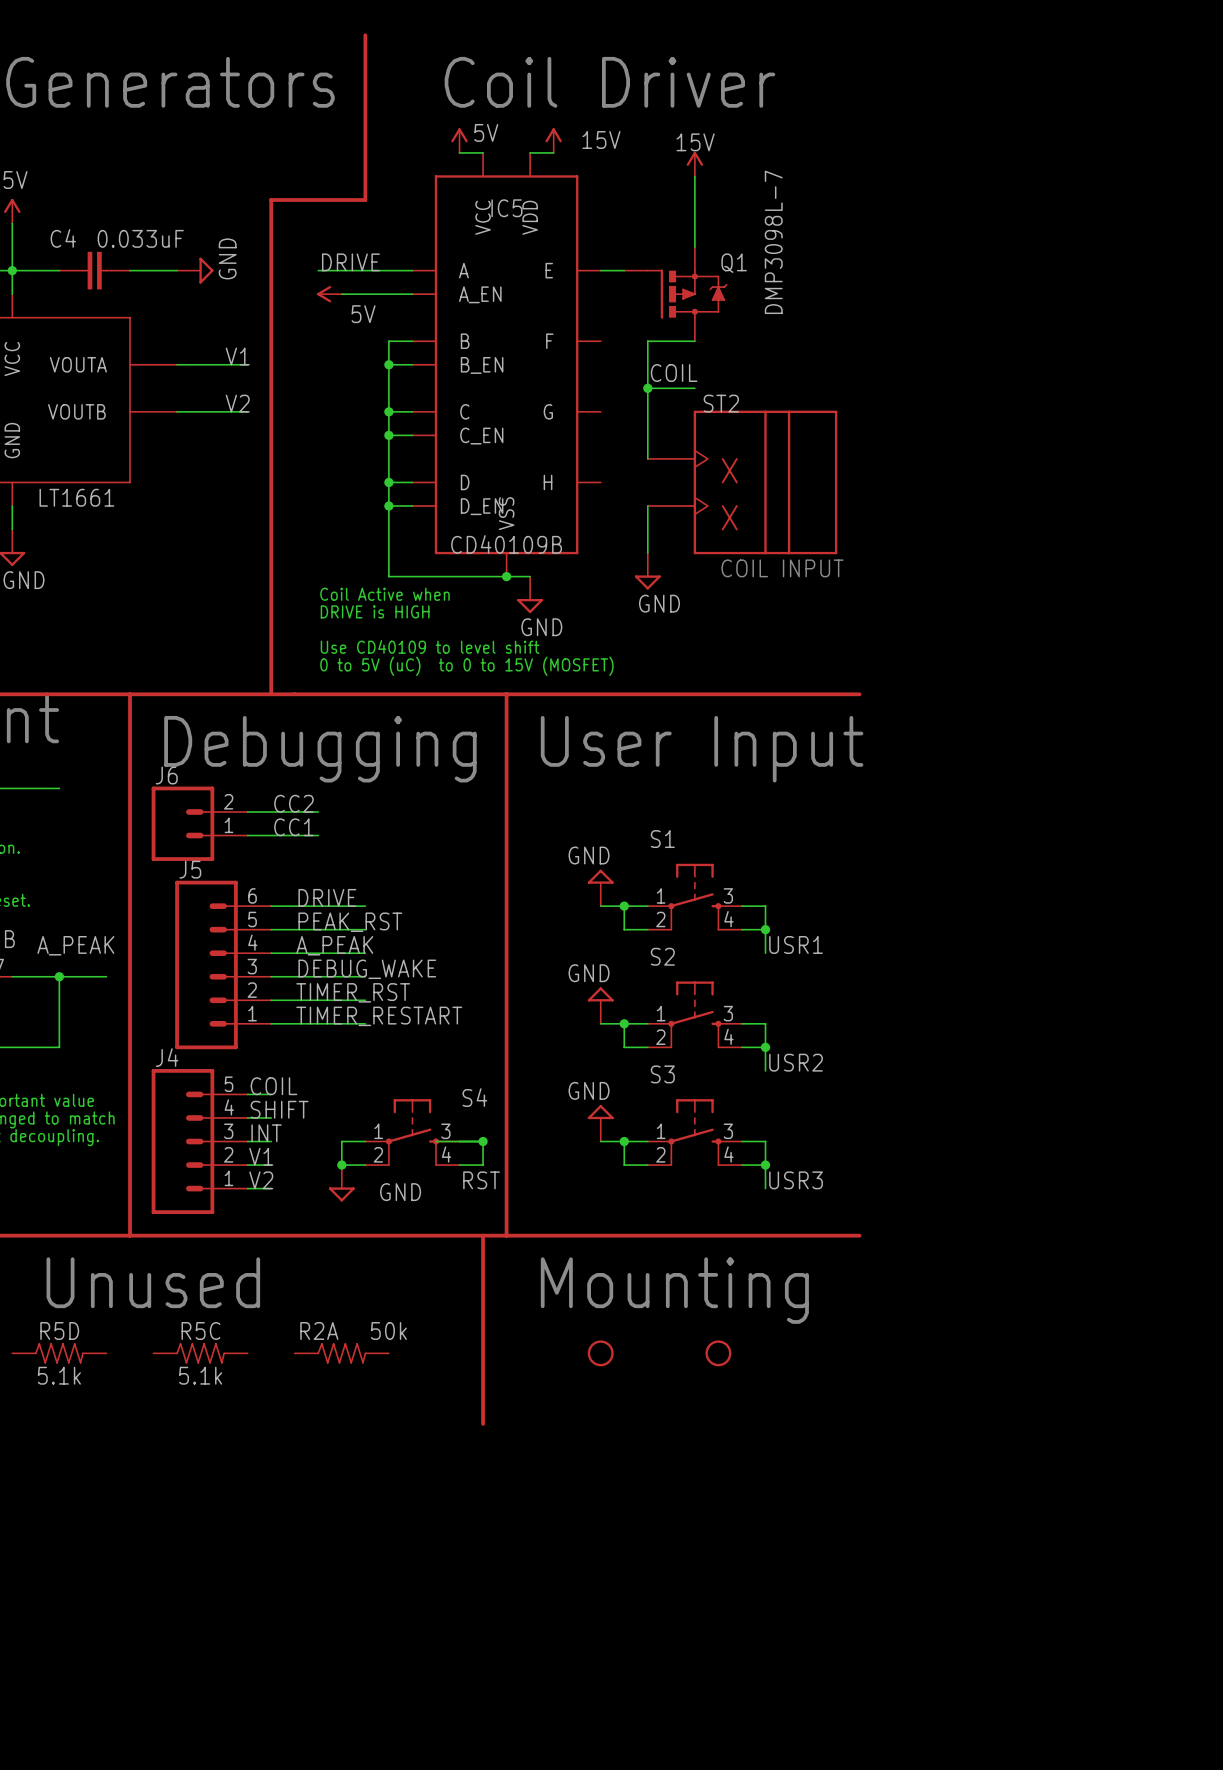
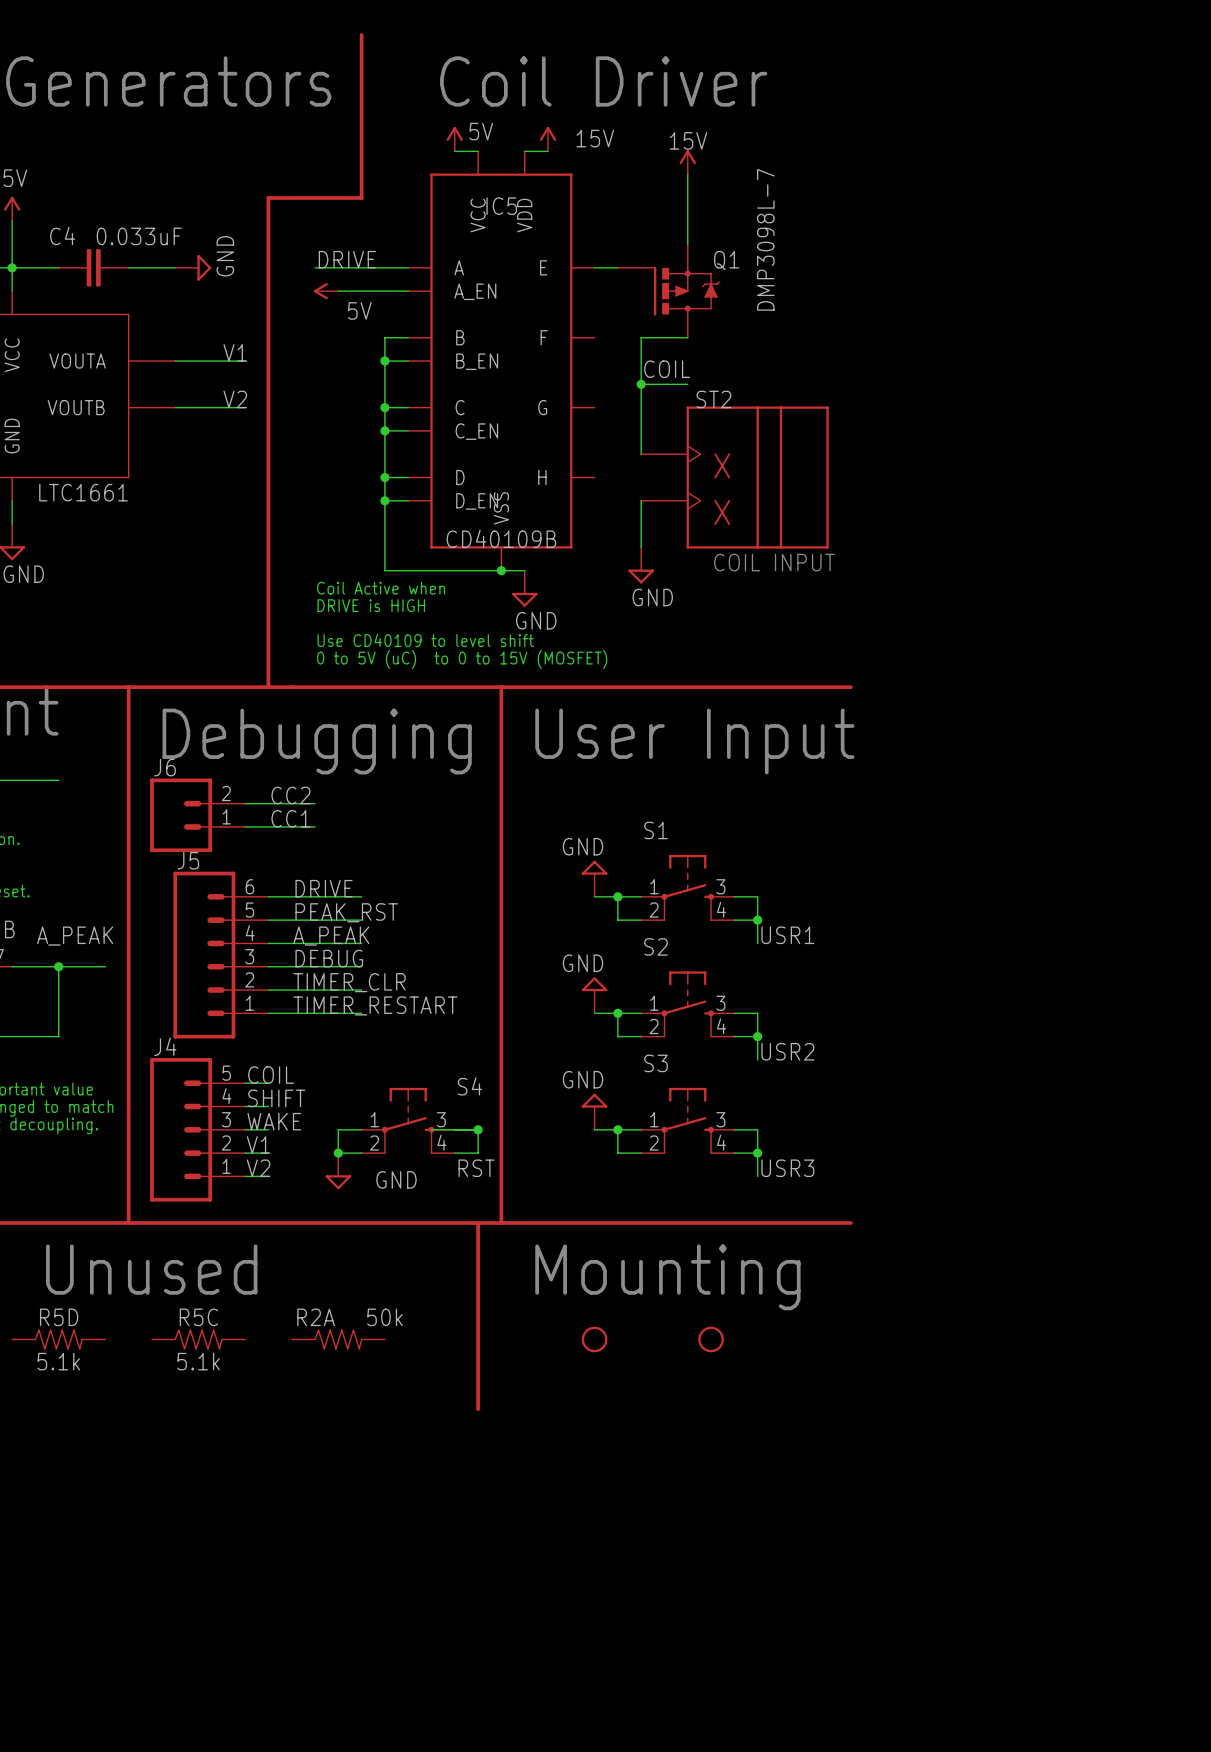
part text: LT1661 (76, 497) -> LTC1661 (83, 492)
label: DEBUG_WAKE (367, 969) -> DEBUG (329, 958)
label: TIMER_RST (353, 992) -> TIMER_CLR (349, 982)
label: INT (266, 1133) -> WAKE (274, 1121)

